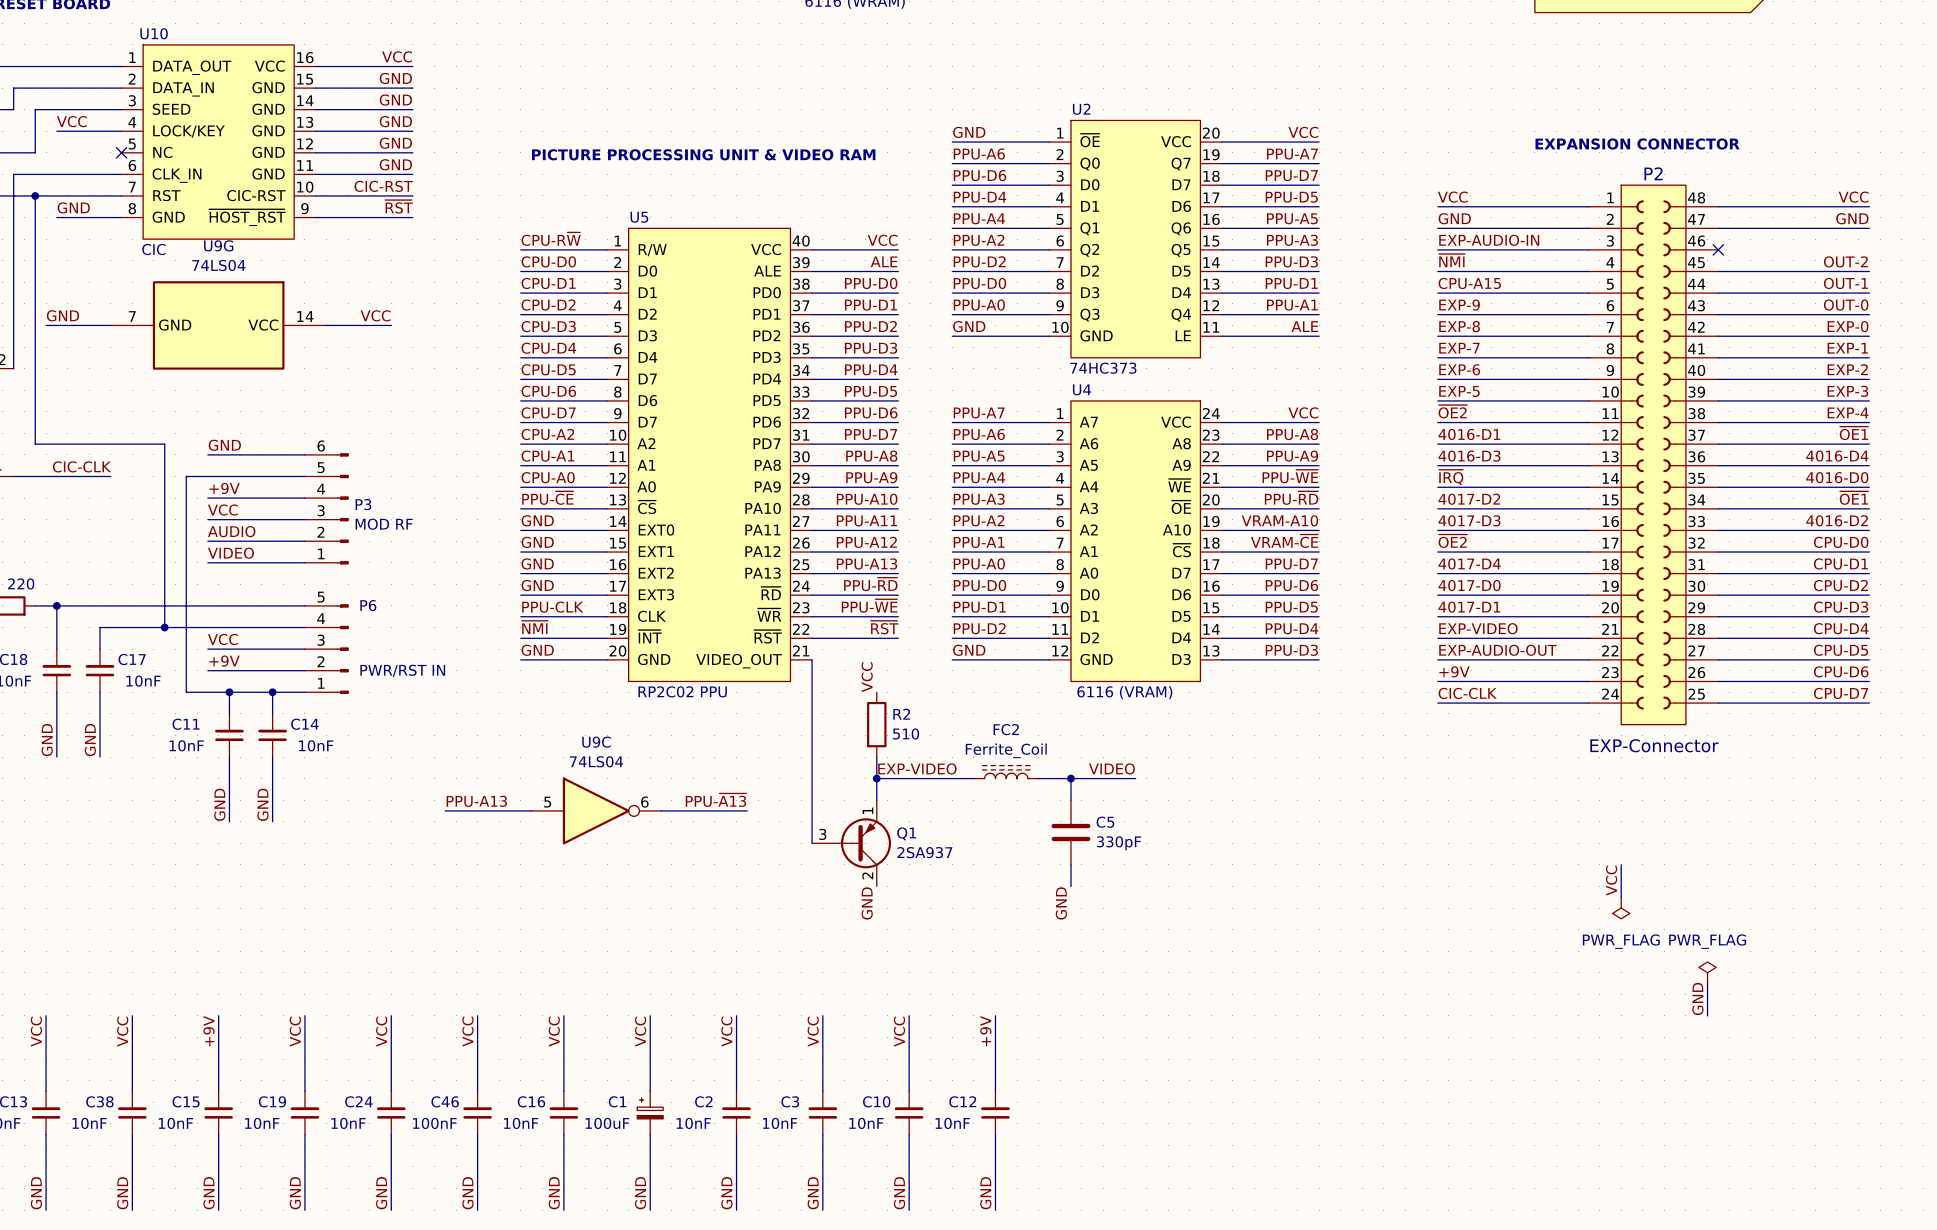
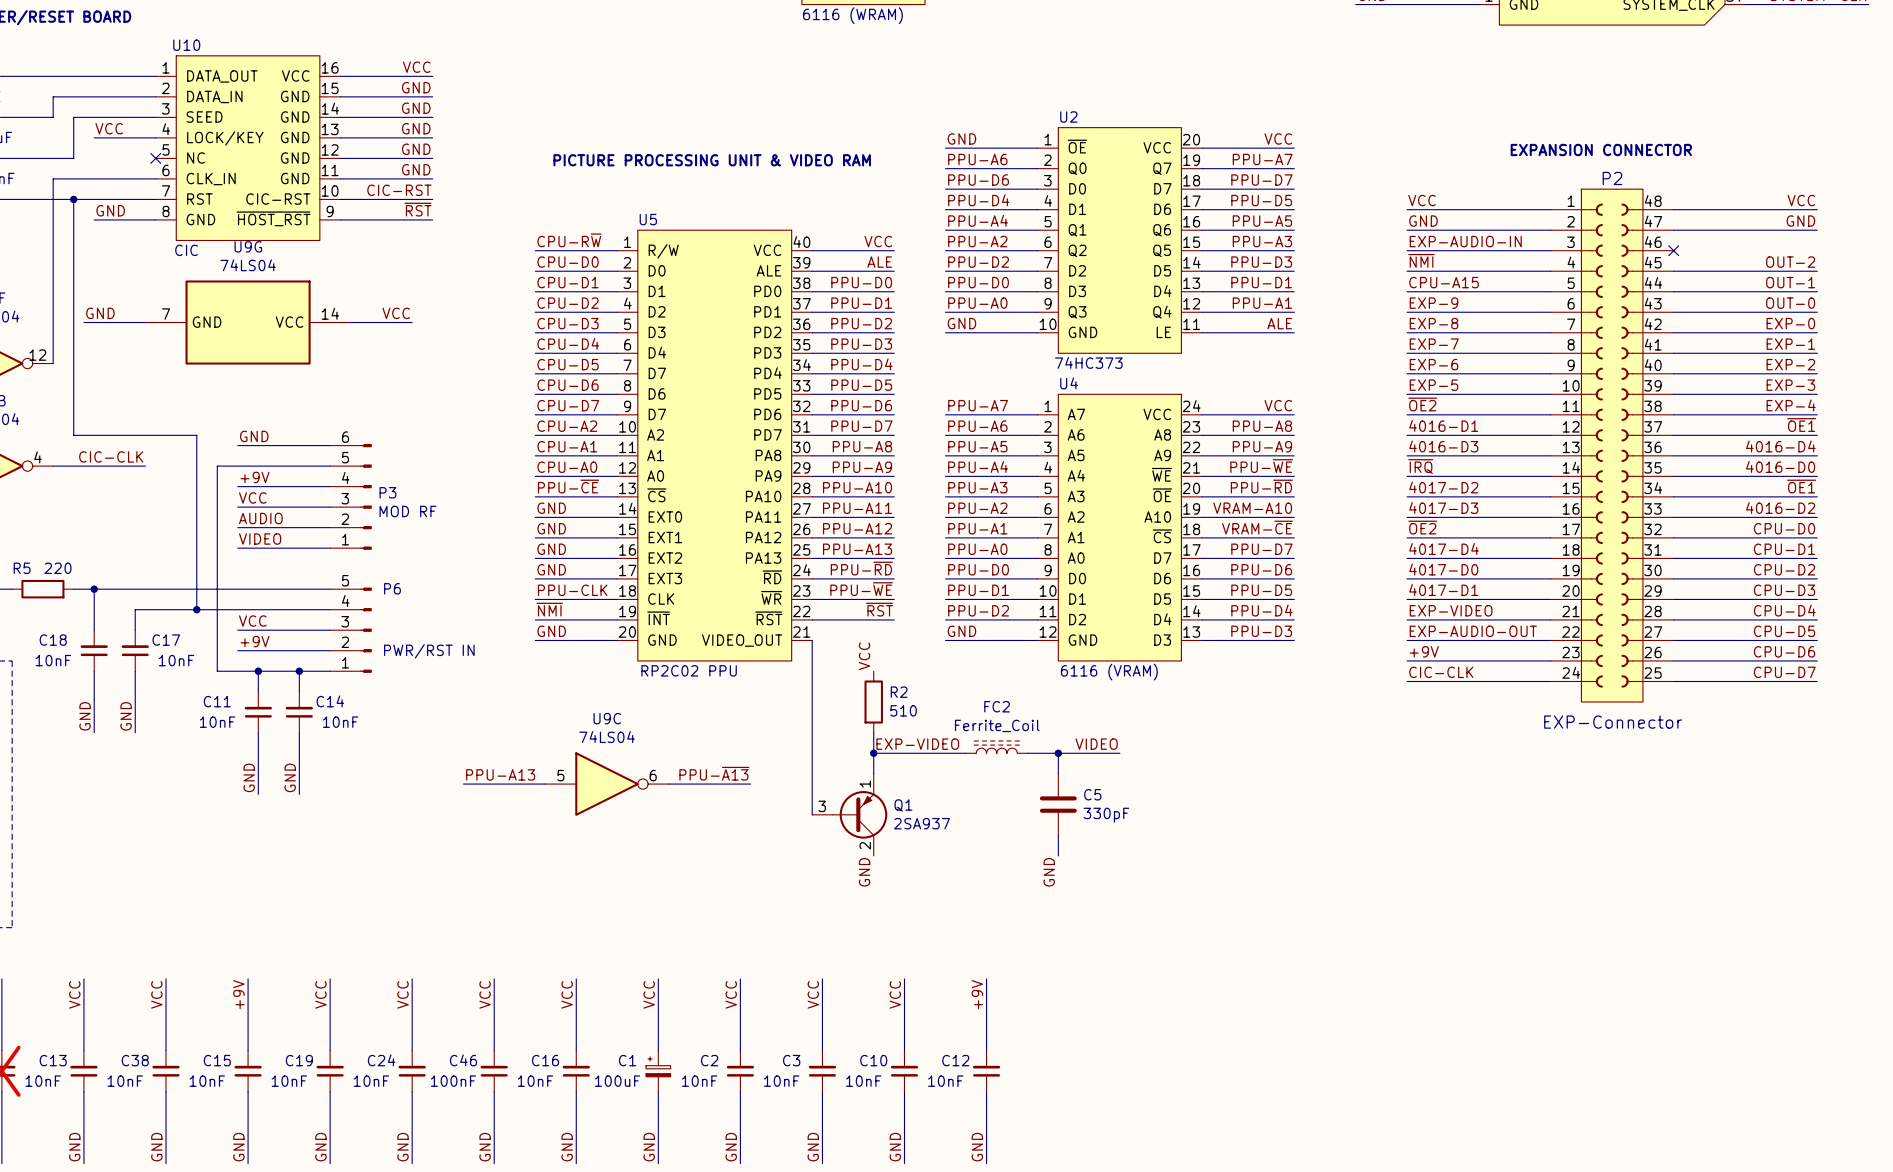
wire: (1621, 864) (1621, 897) -> none
label: VCC (1611, 880) -> none
power symbol: PWR_FLAG (1621, 908) -> none
power symbol: PWR_FLAG (1707, 972) -> none
wire: (1707, 983) (1707, 1015) -> none
label: GND (1697, 998) -> none

